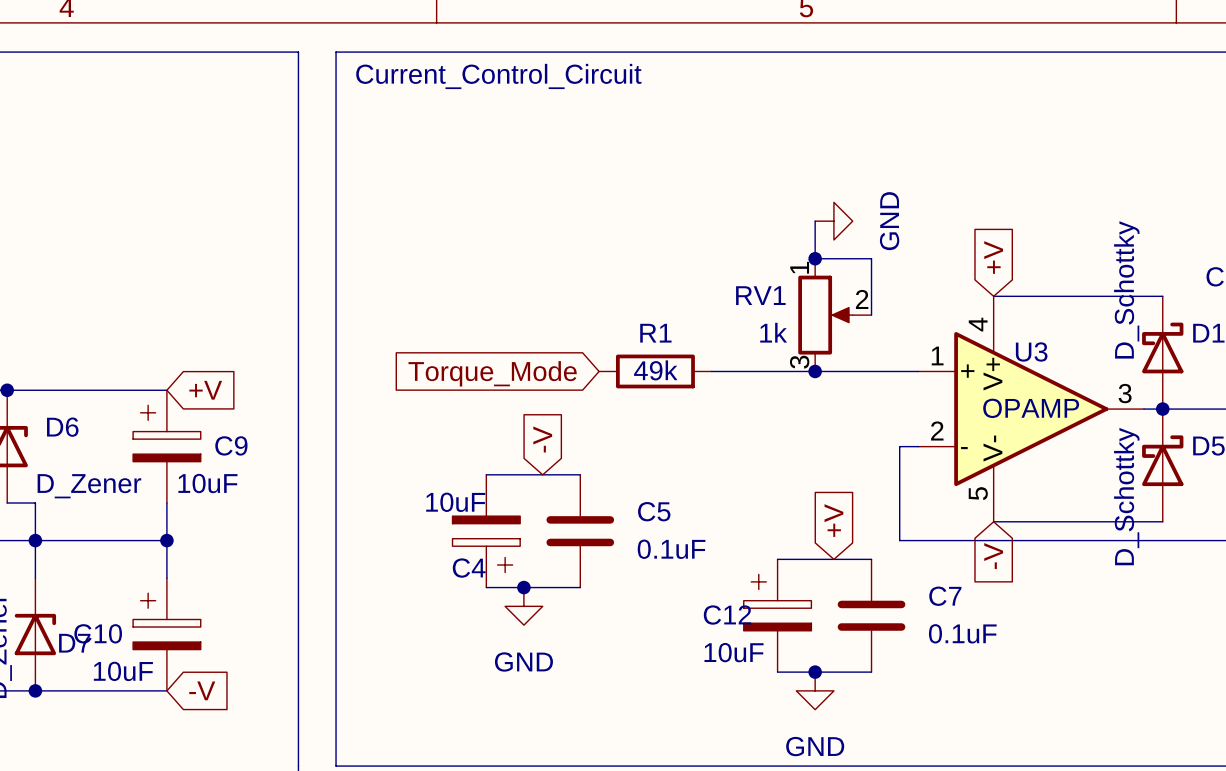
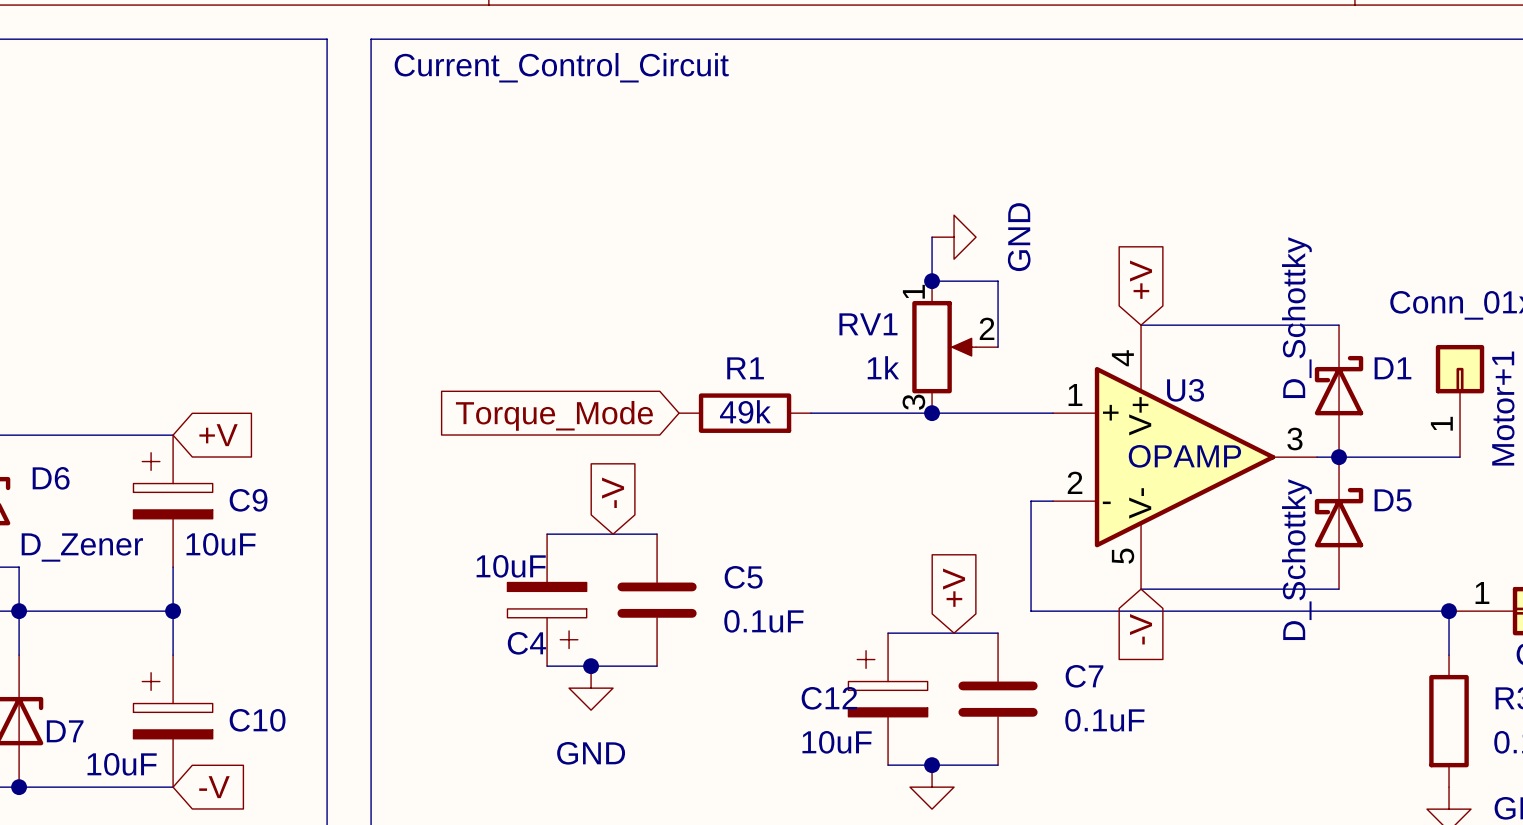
C10 name position: C10 (98, 633) -> C10 (257, 720)

